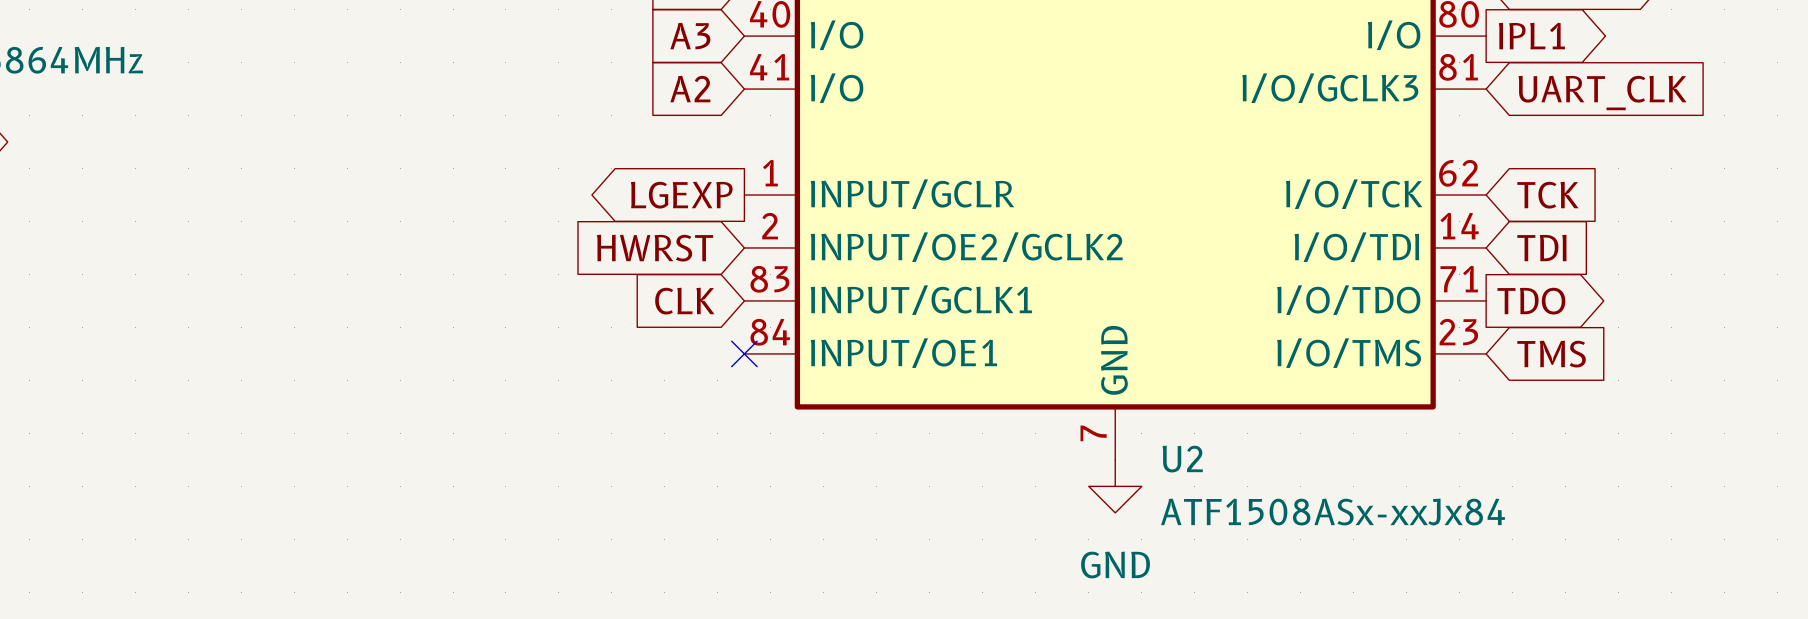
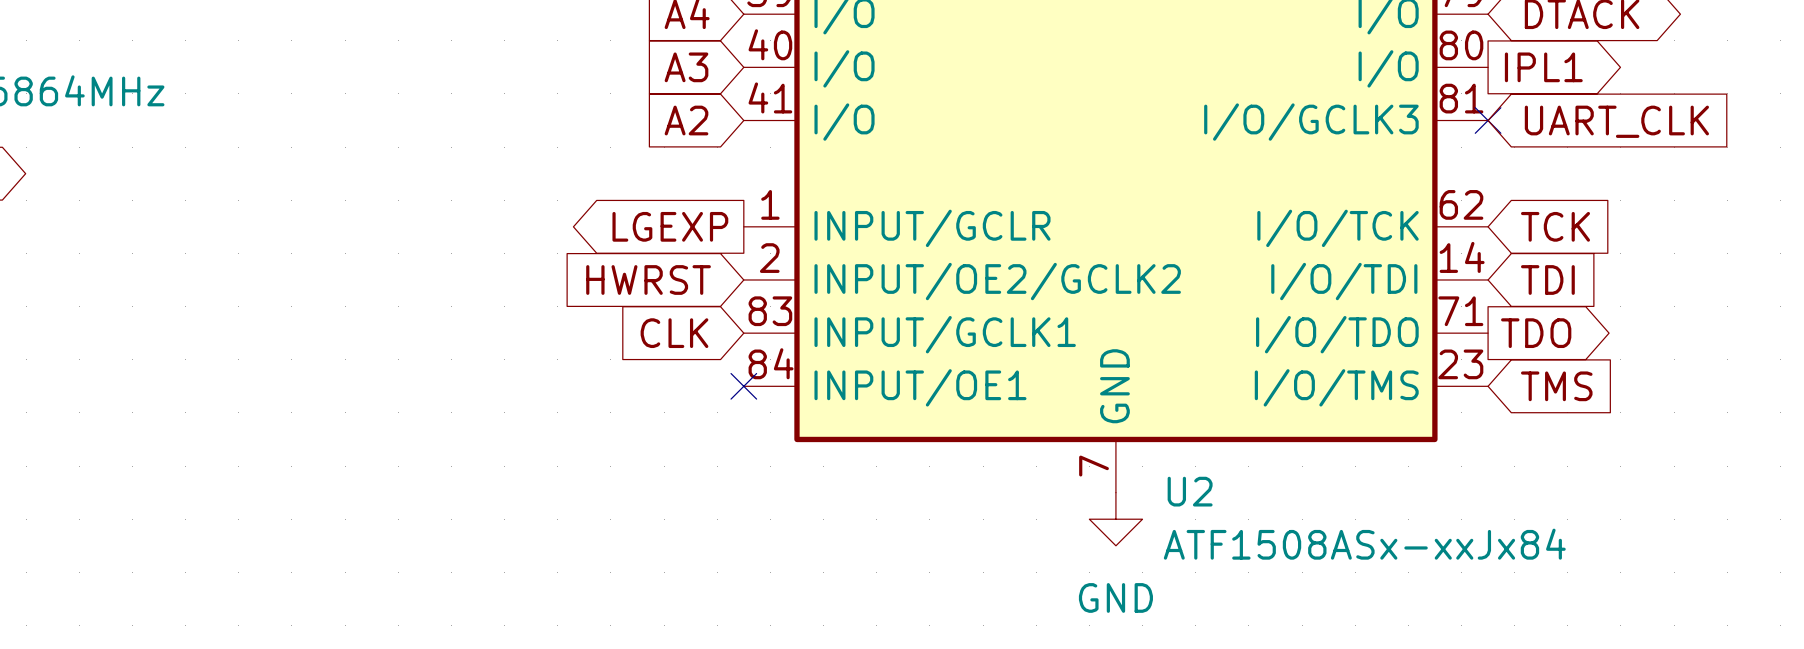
no-connect mark: none -> (1488, 120)

